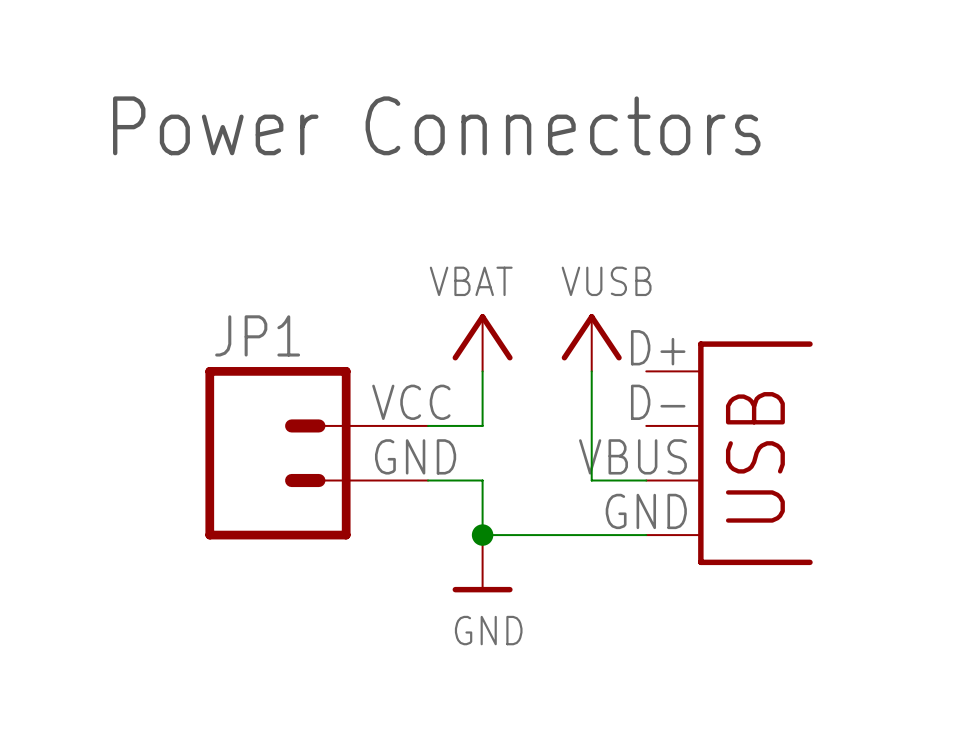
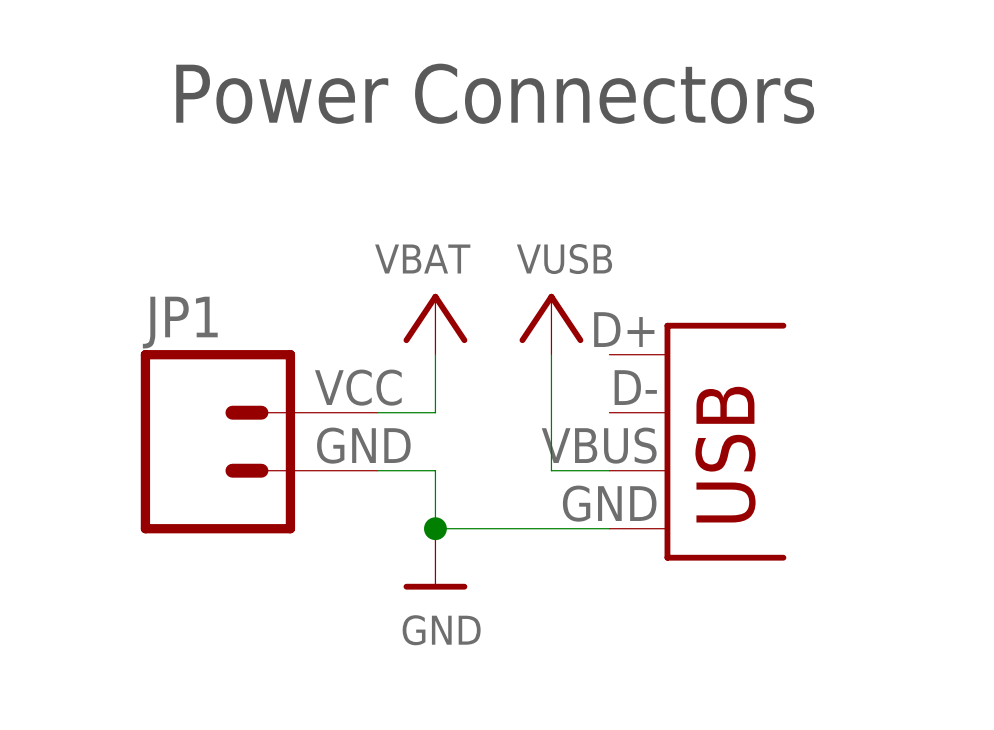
text position: Power Connectors (436, 125) -> Power Connectors (495, 93)

